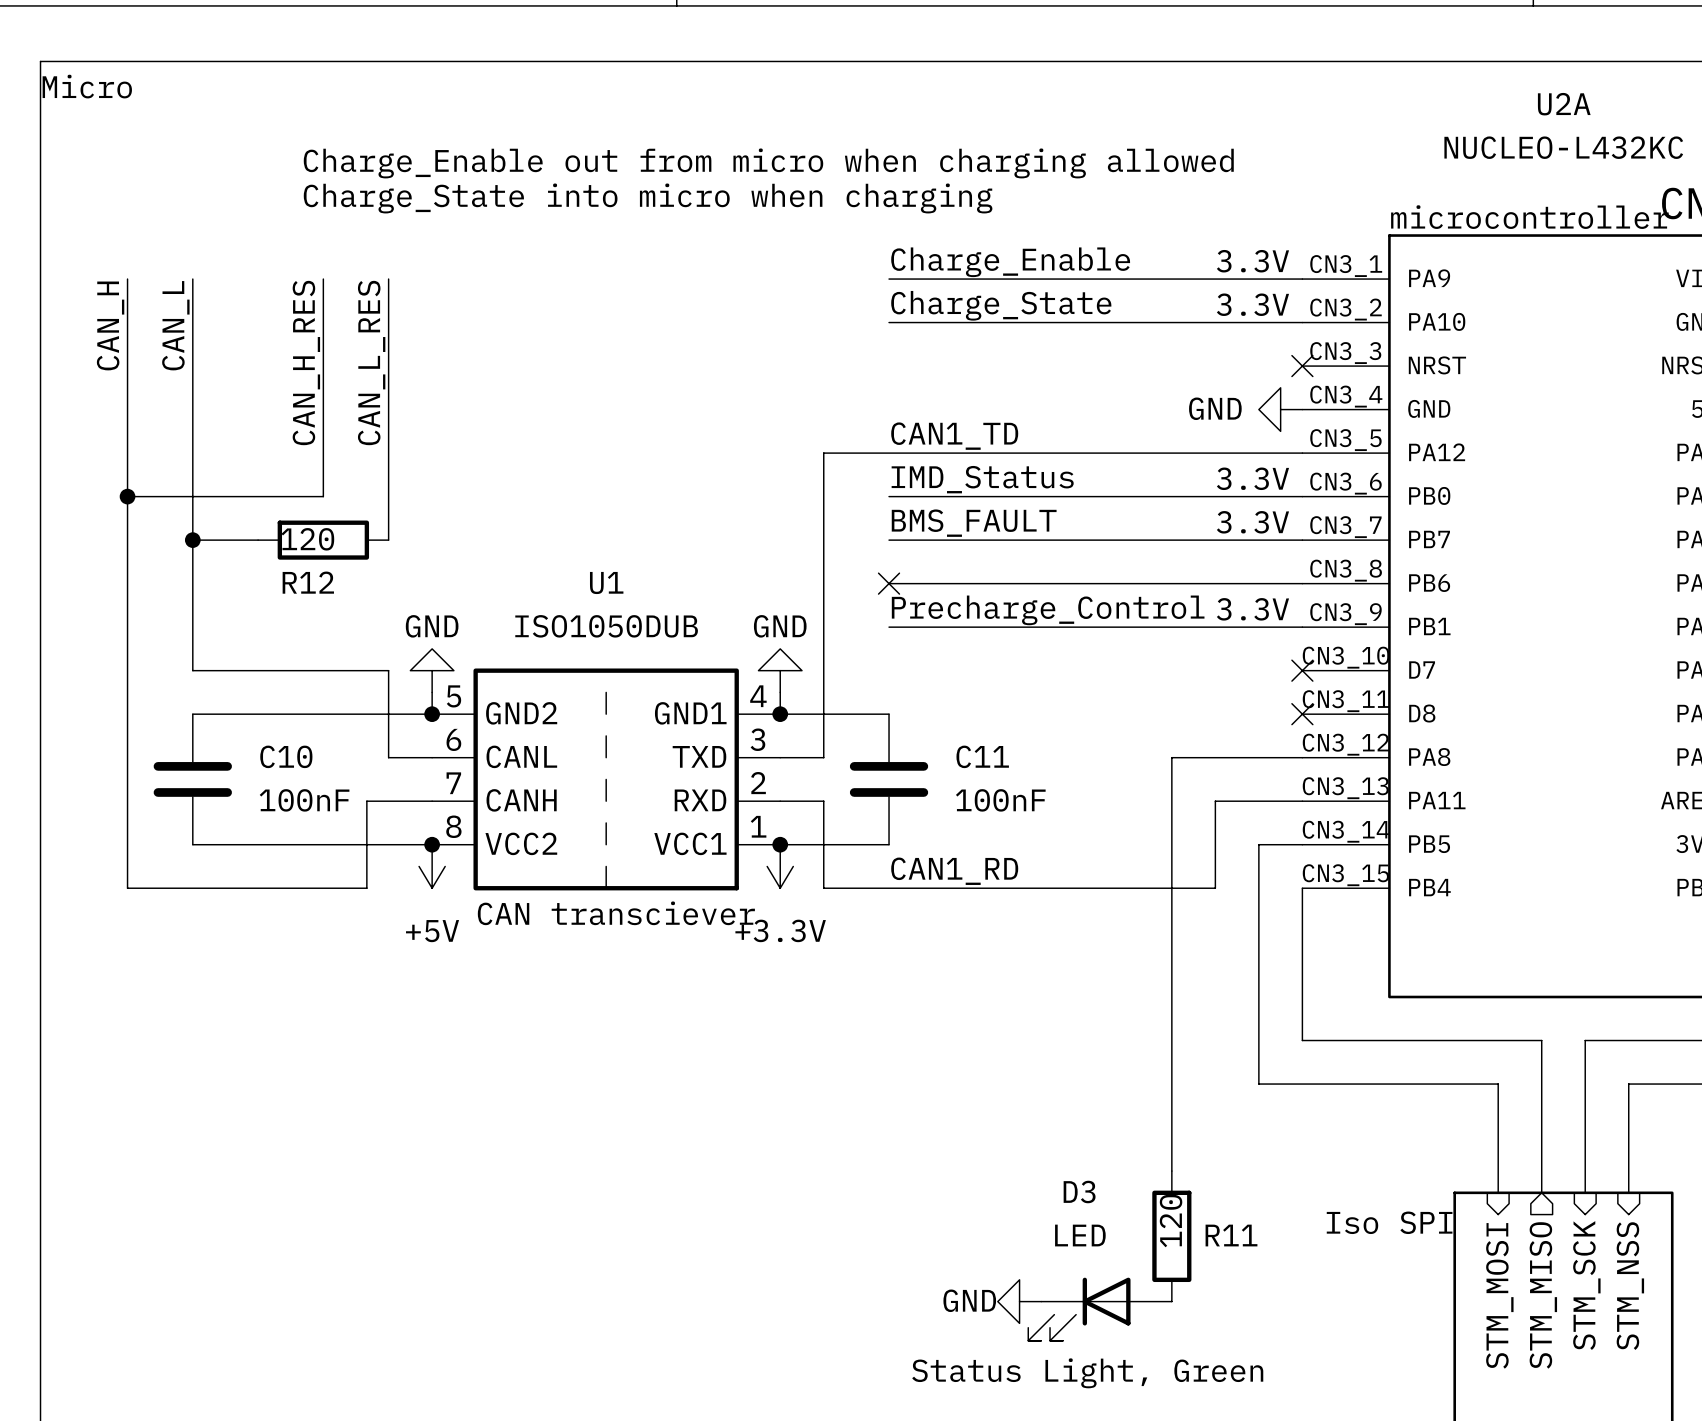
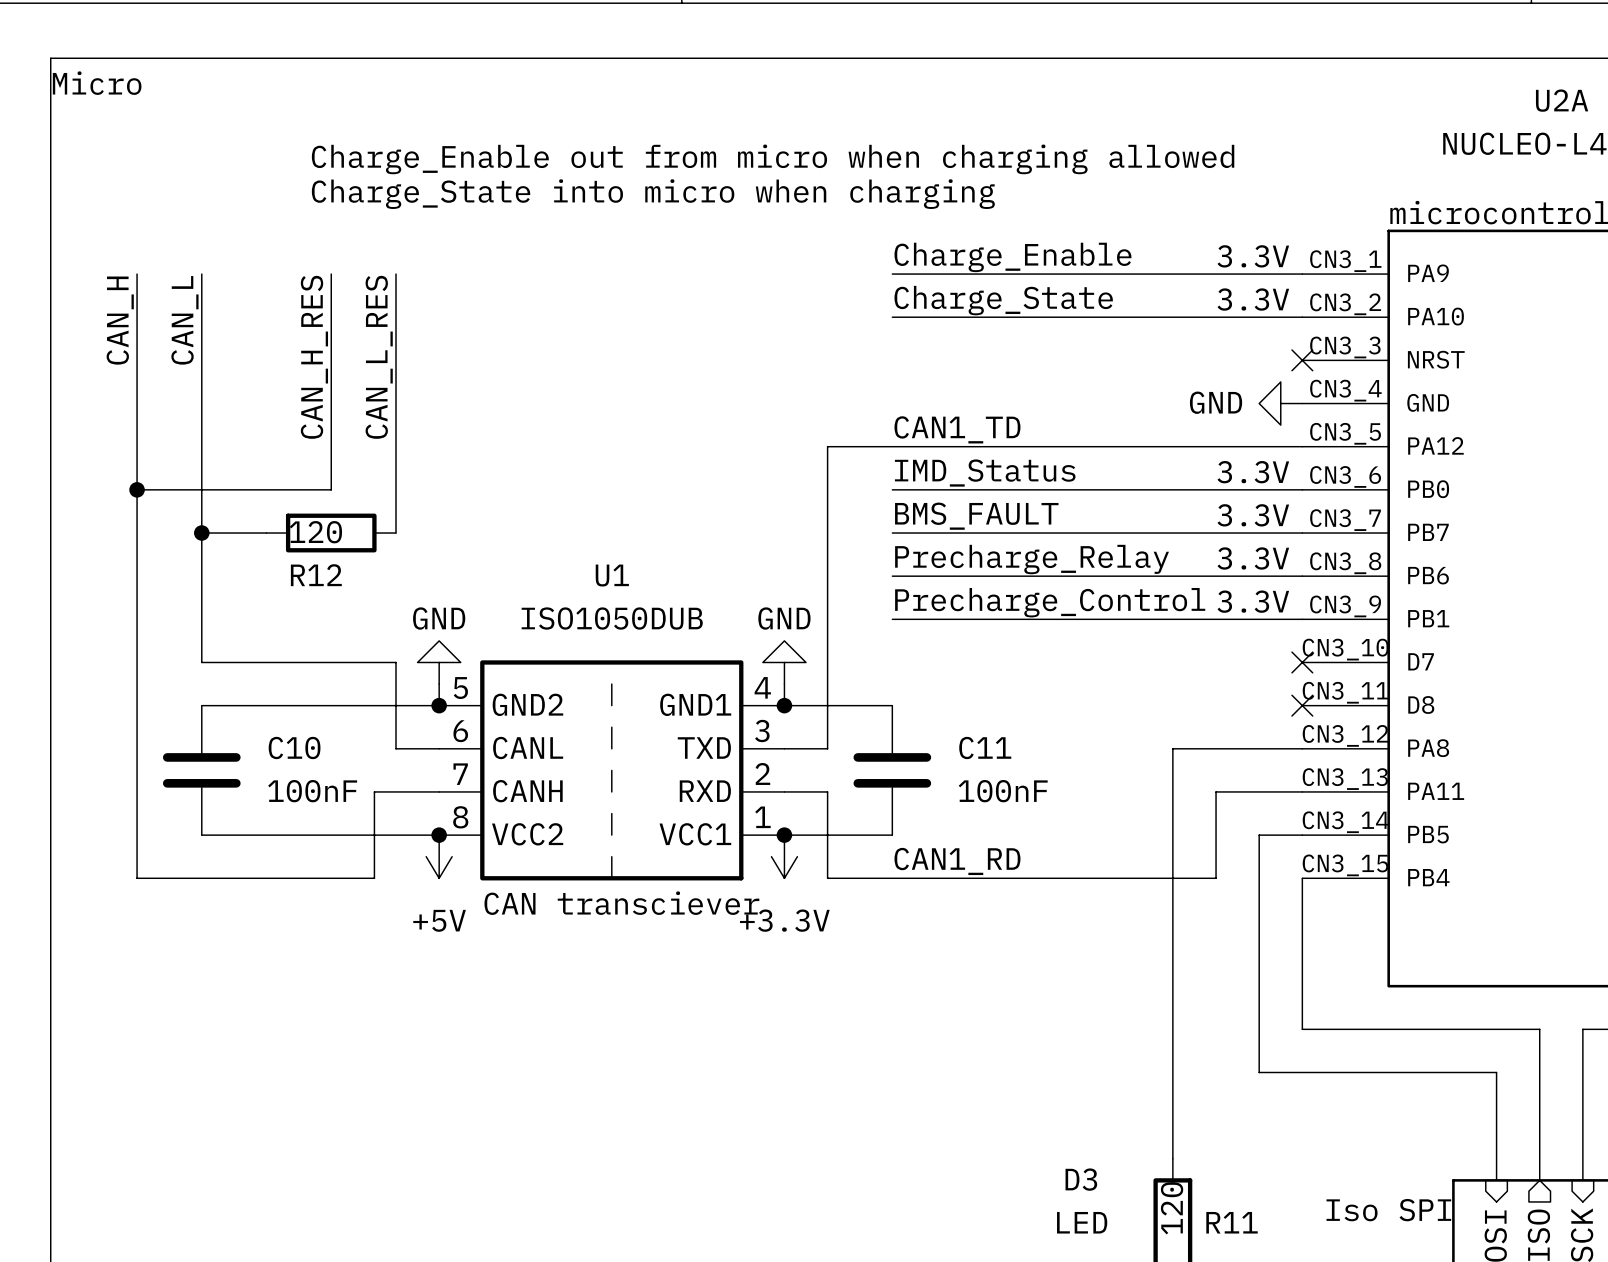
text: none -> 3.3V (1253, 558)
label: none -> Precharge_Relay (1032, 559)
no-connect mark: (889, 583) -> none

